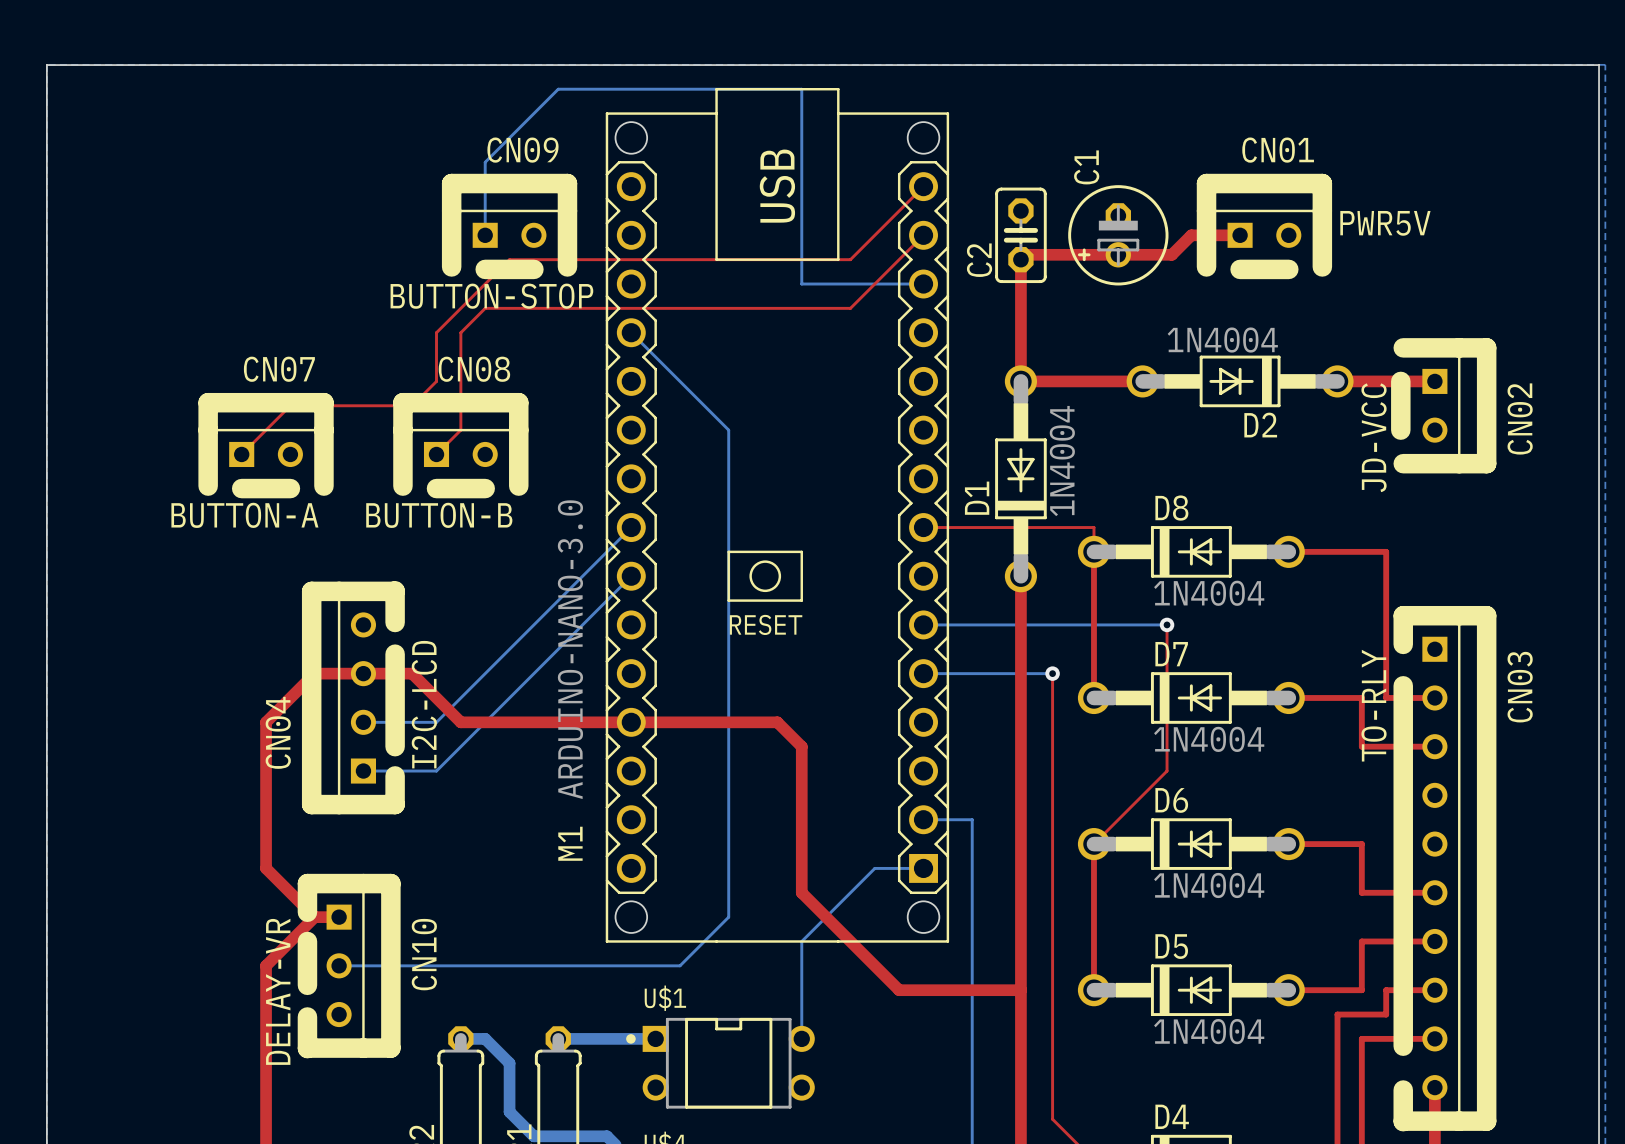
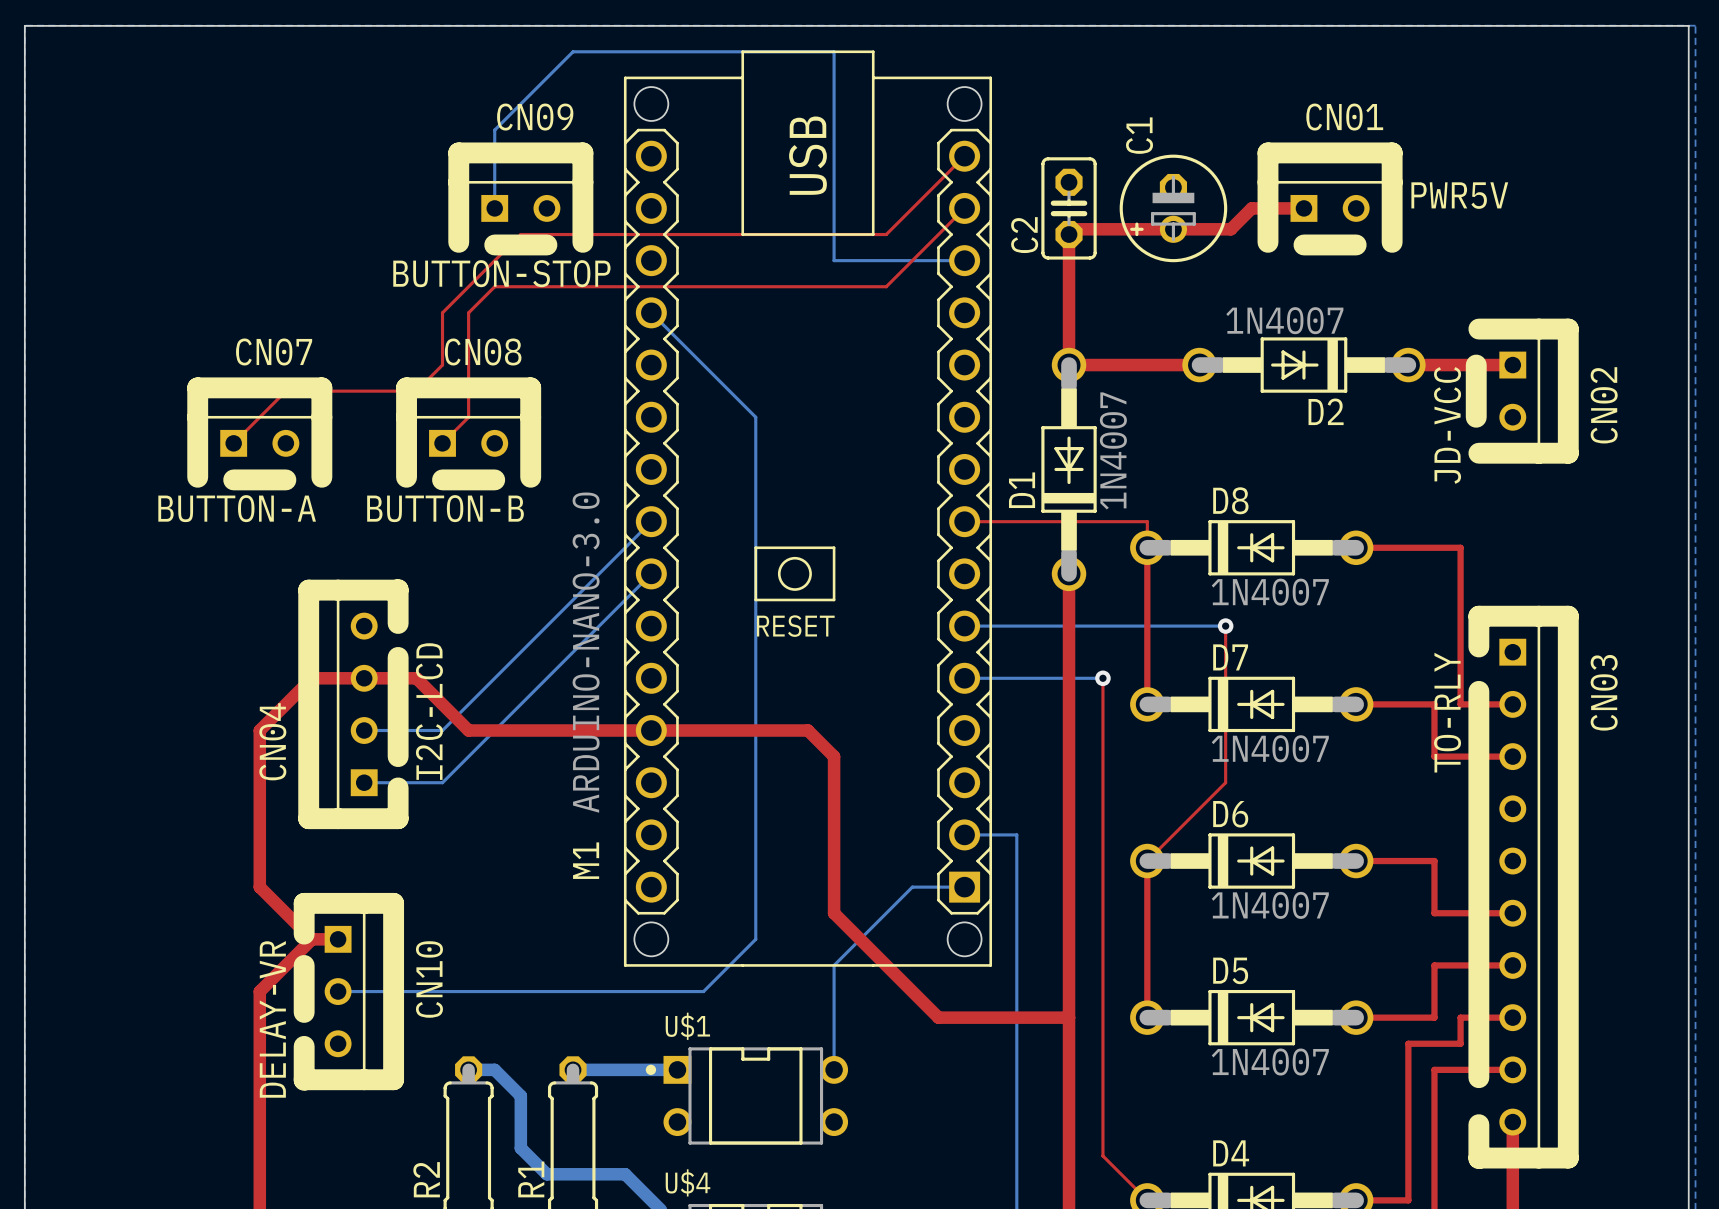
D2 value: 1N4004 (1222, 340) -> 1N4007 (1284, 320)
D1 value: 1N4004 (1062, 461) -> 1N4007 (1113, 450)
D8 value: 1N4004 (1209, 593) -> 1N4007 (1270, 592)
D7 value: 1N4004 (1209, 739) -> 1N4007 (1270, 748)
D6 value: 1N4004 (1209, 885) -> 1N4007 (1270, 905)
D5 value: 1N4004 (1209, 1031) -> 1N4007 (1270, 1062)

